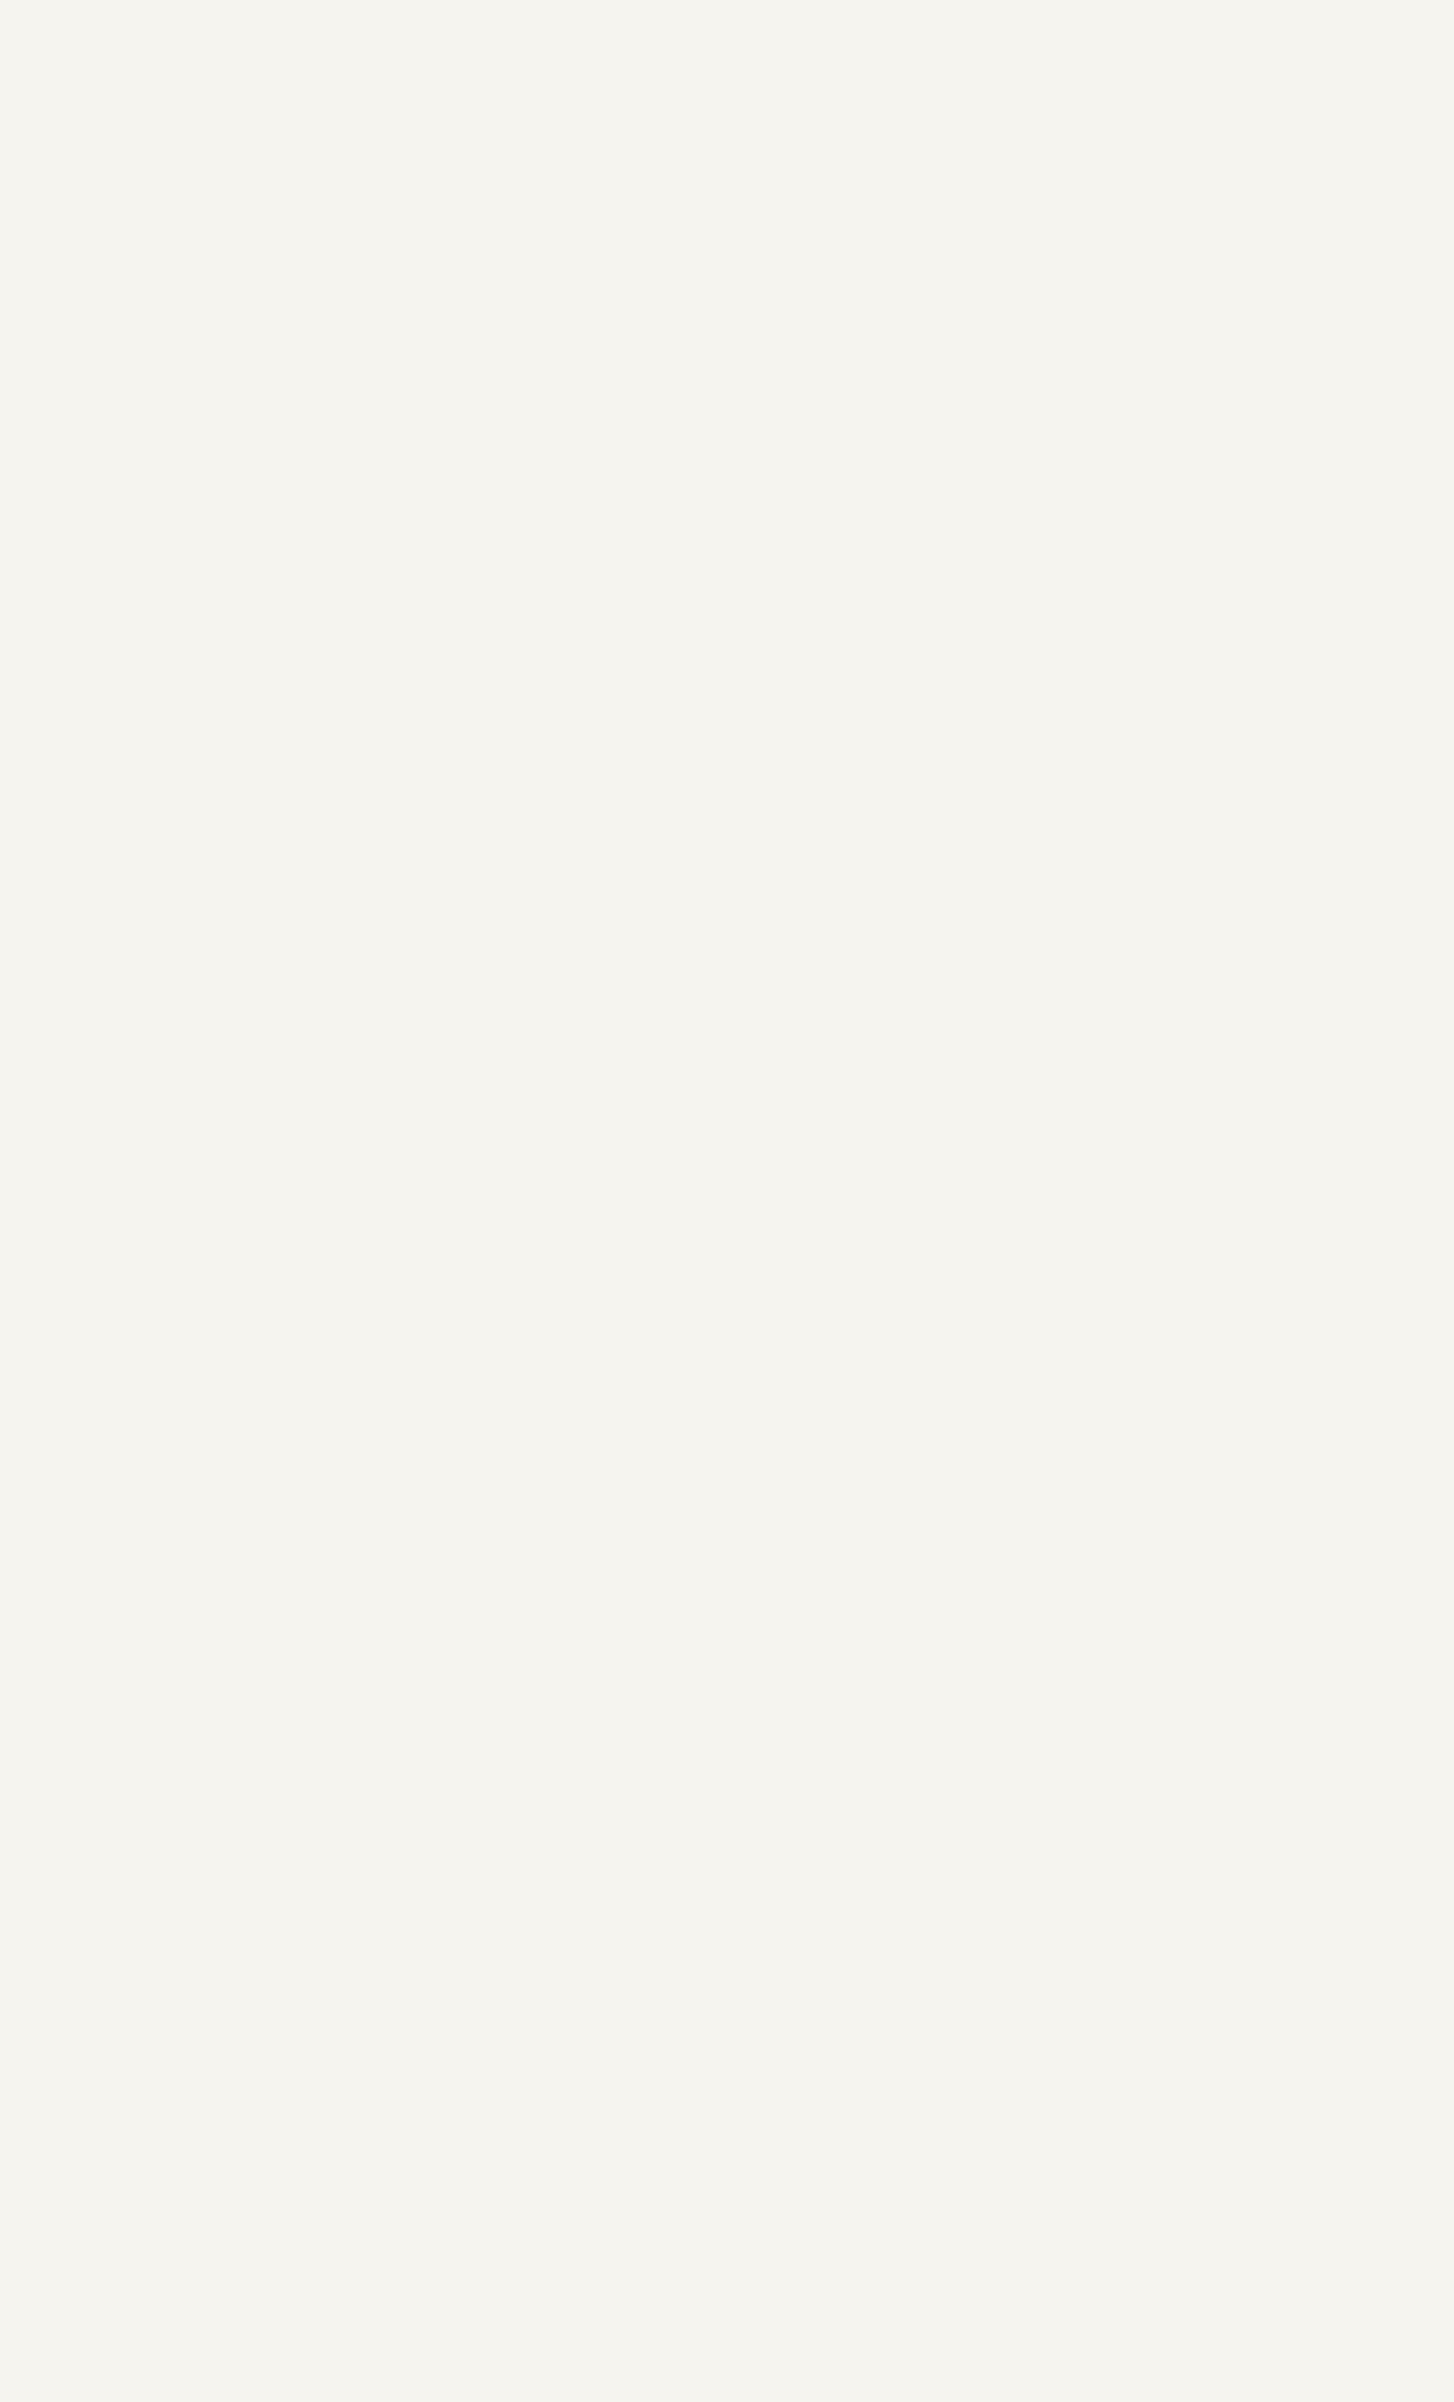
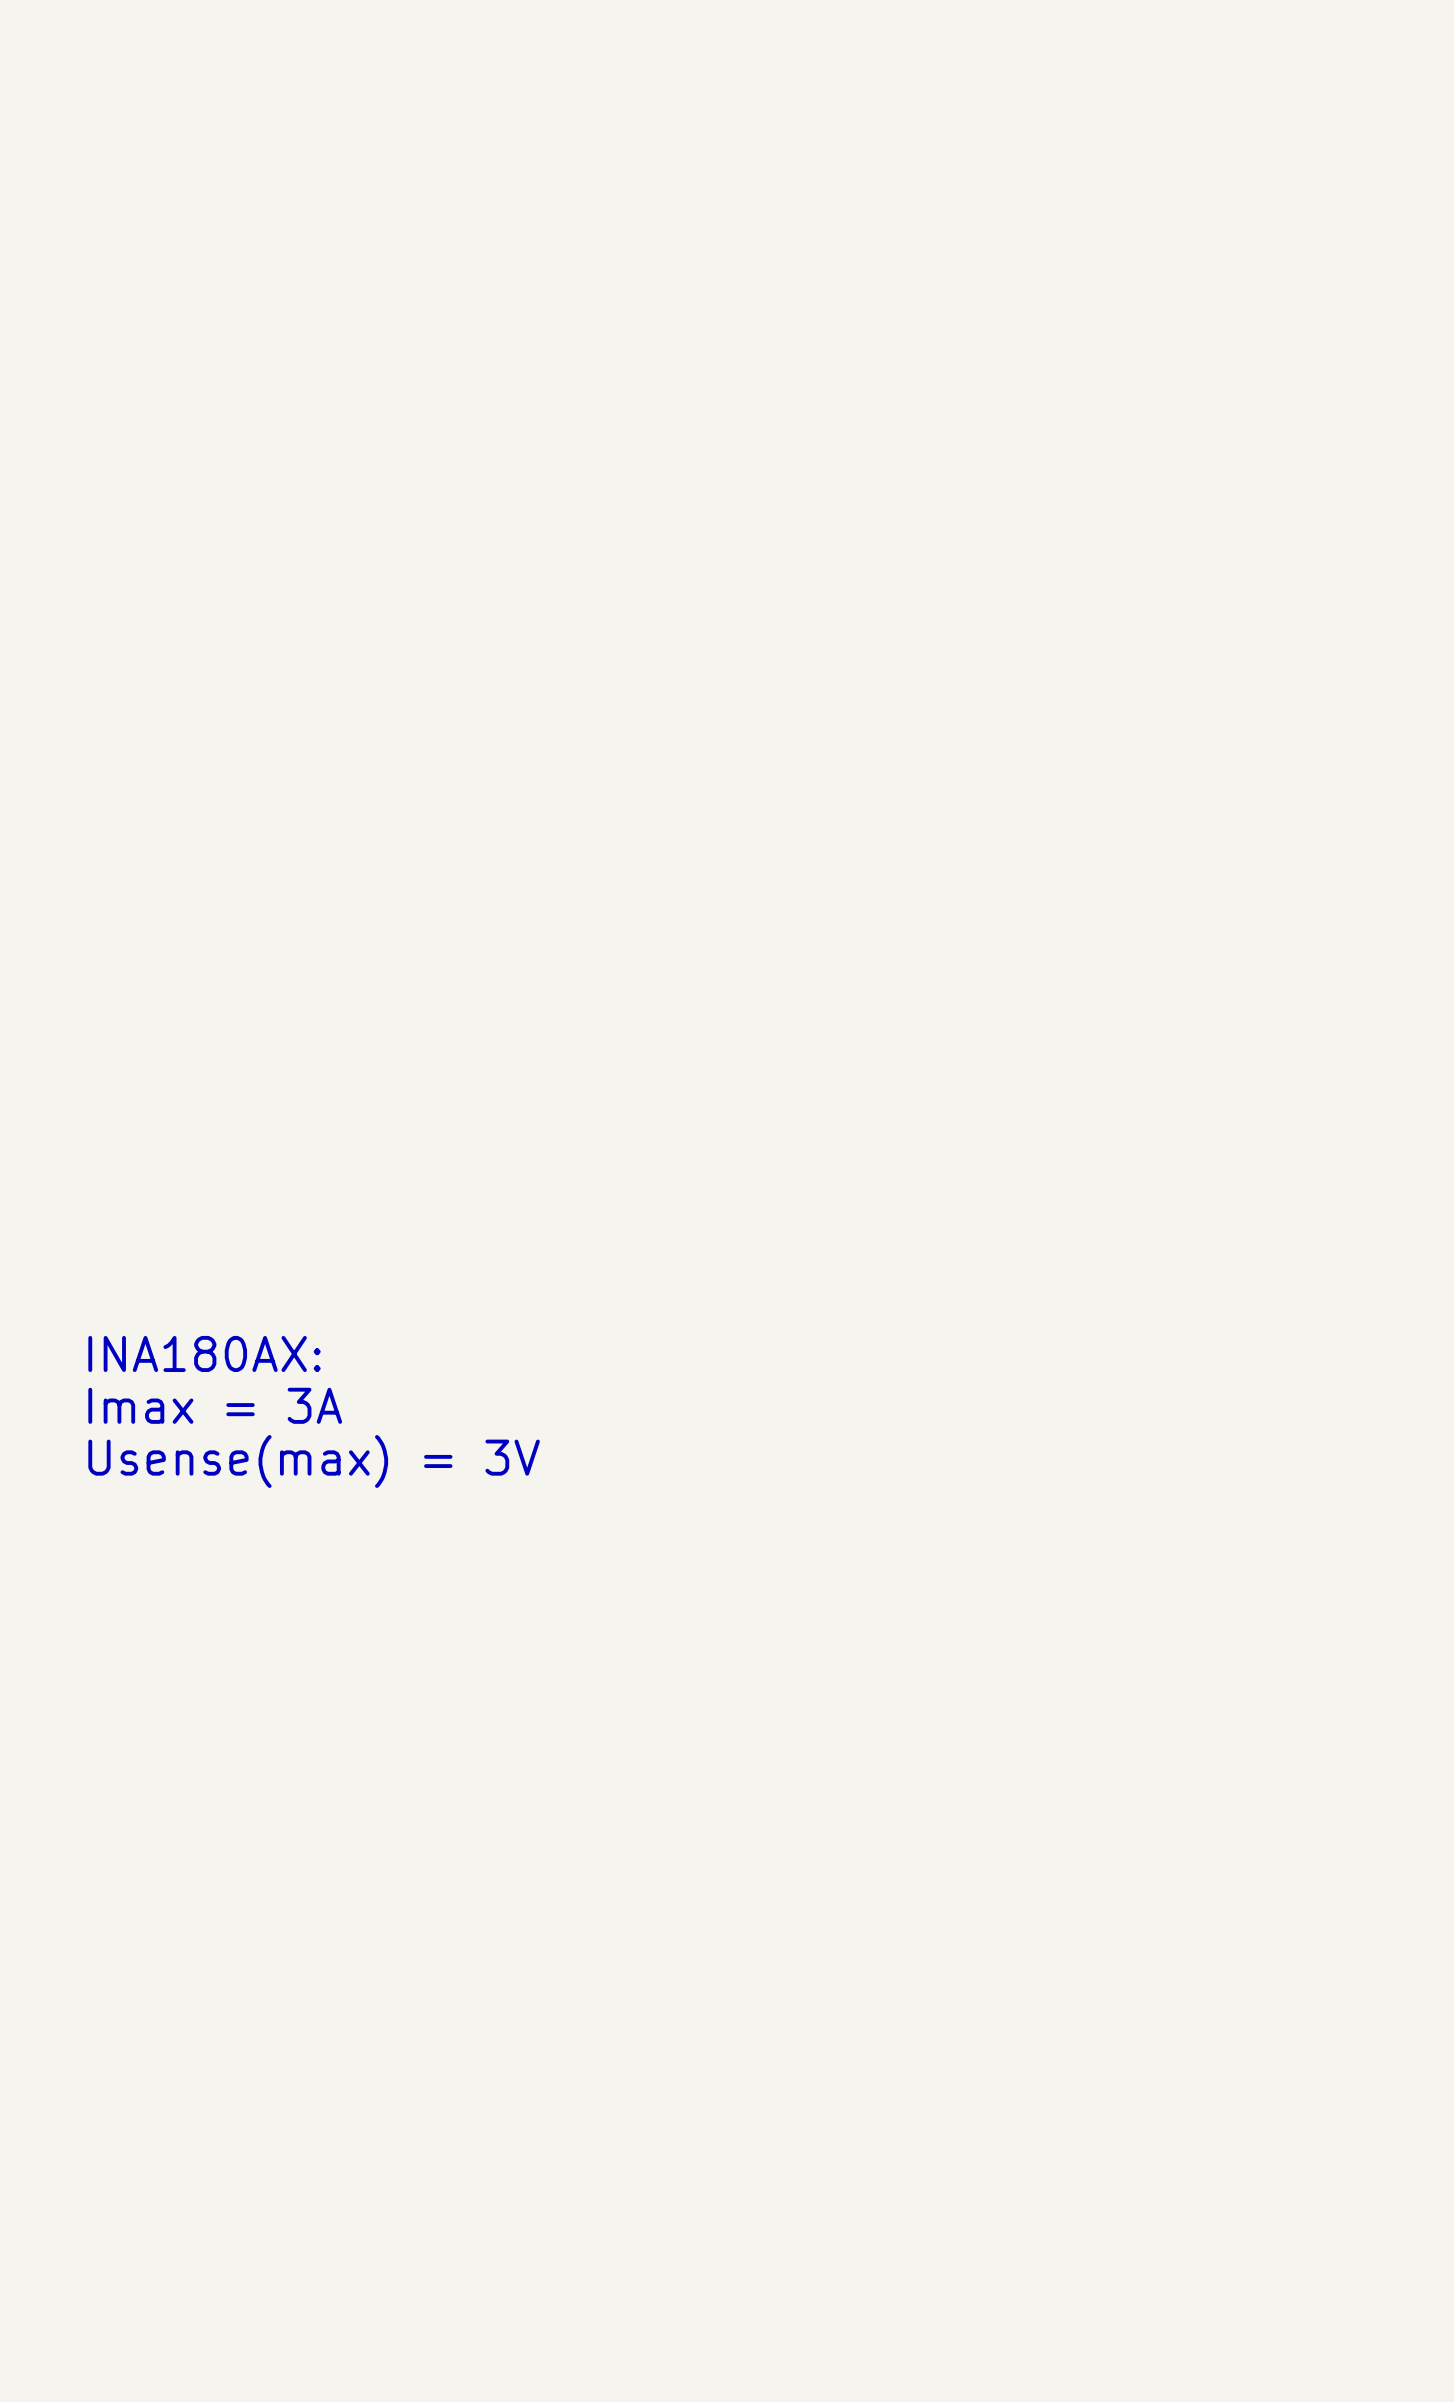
text: none -> INA180AX: (204, 1353)
text: none -> Imax = 3A (215, 1405)
text: none -> Usense(max) = 3V (314, 1461)

